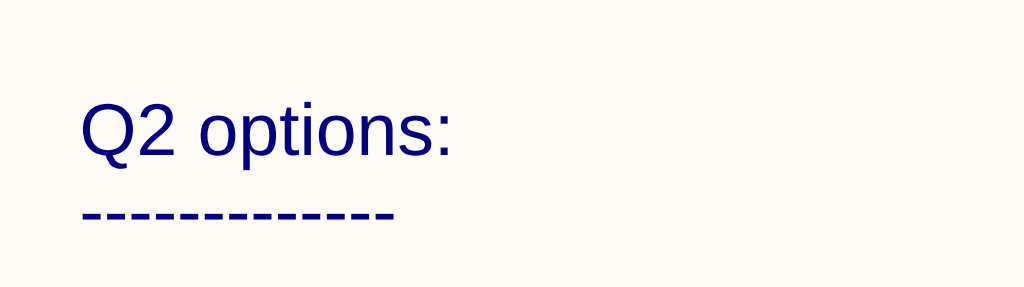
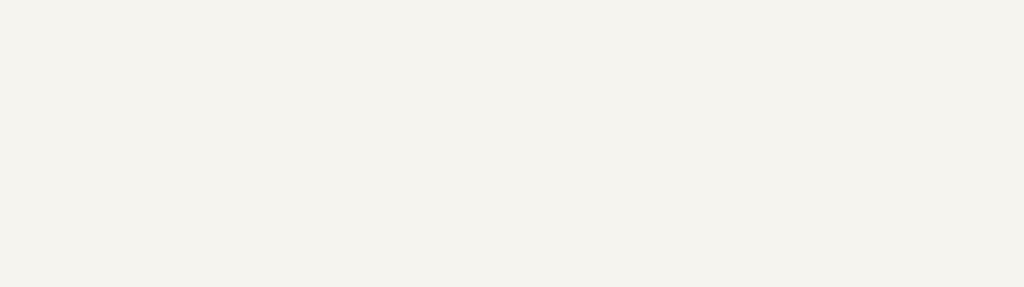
text: Q2 options: (265, 136) -> none
text: ------------- (238, 216) -> none

